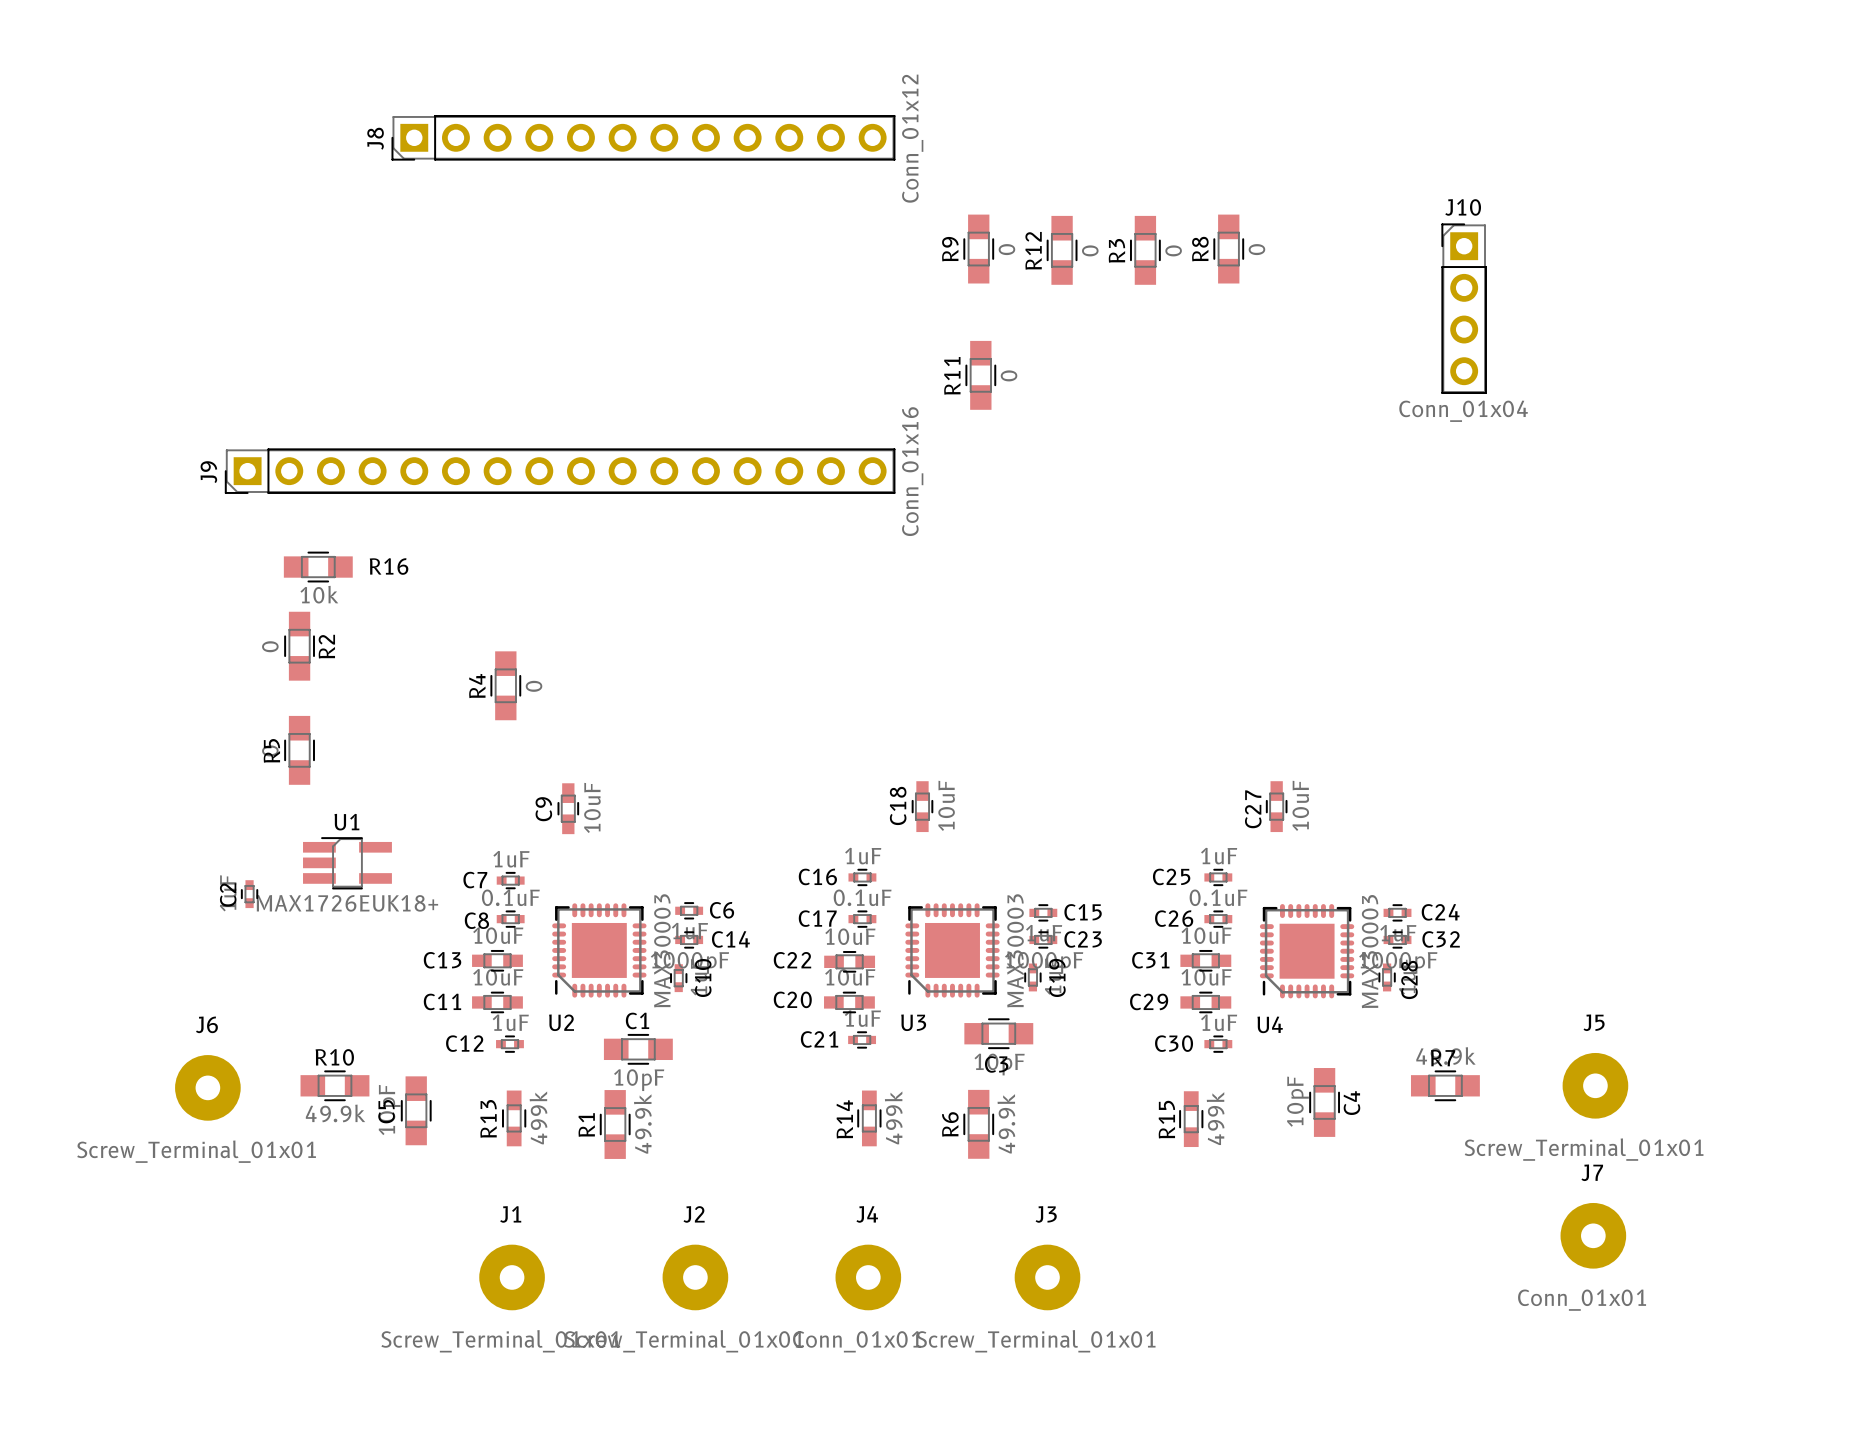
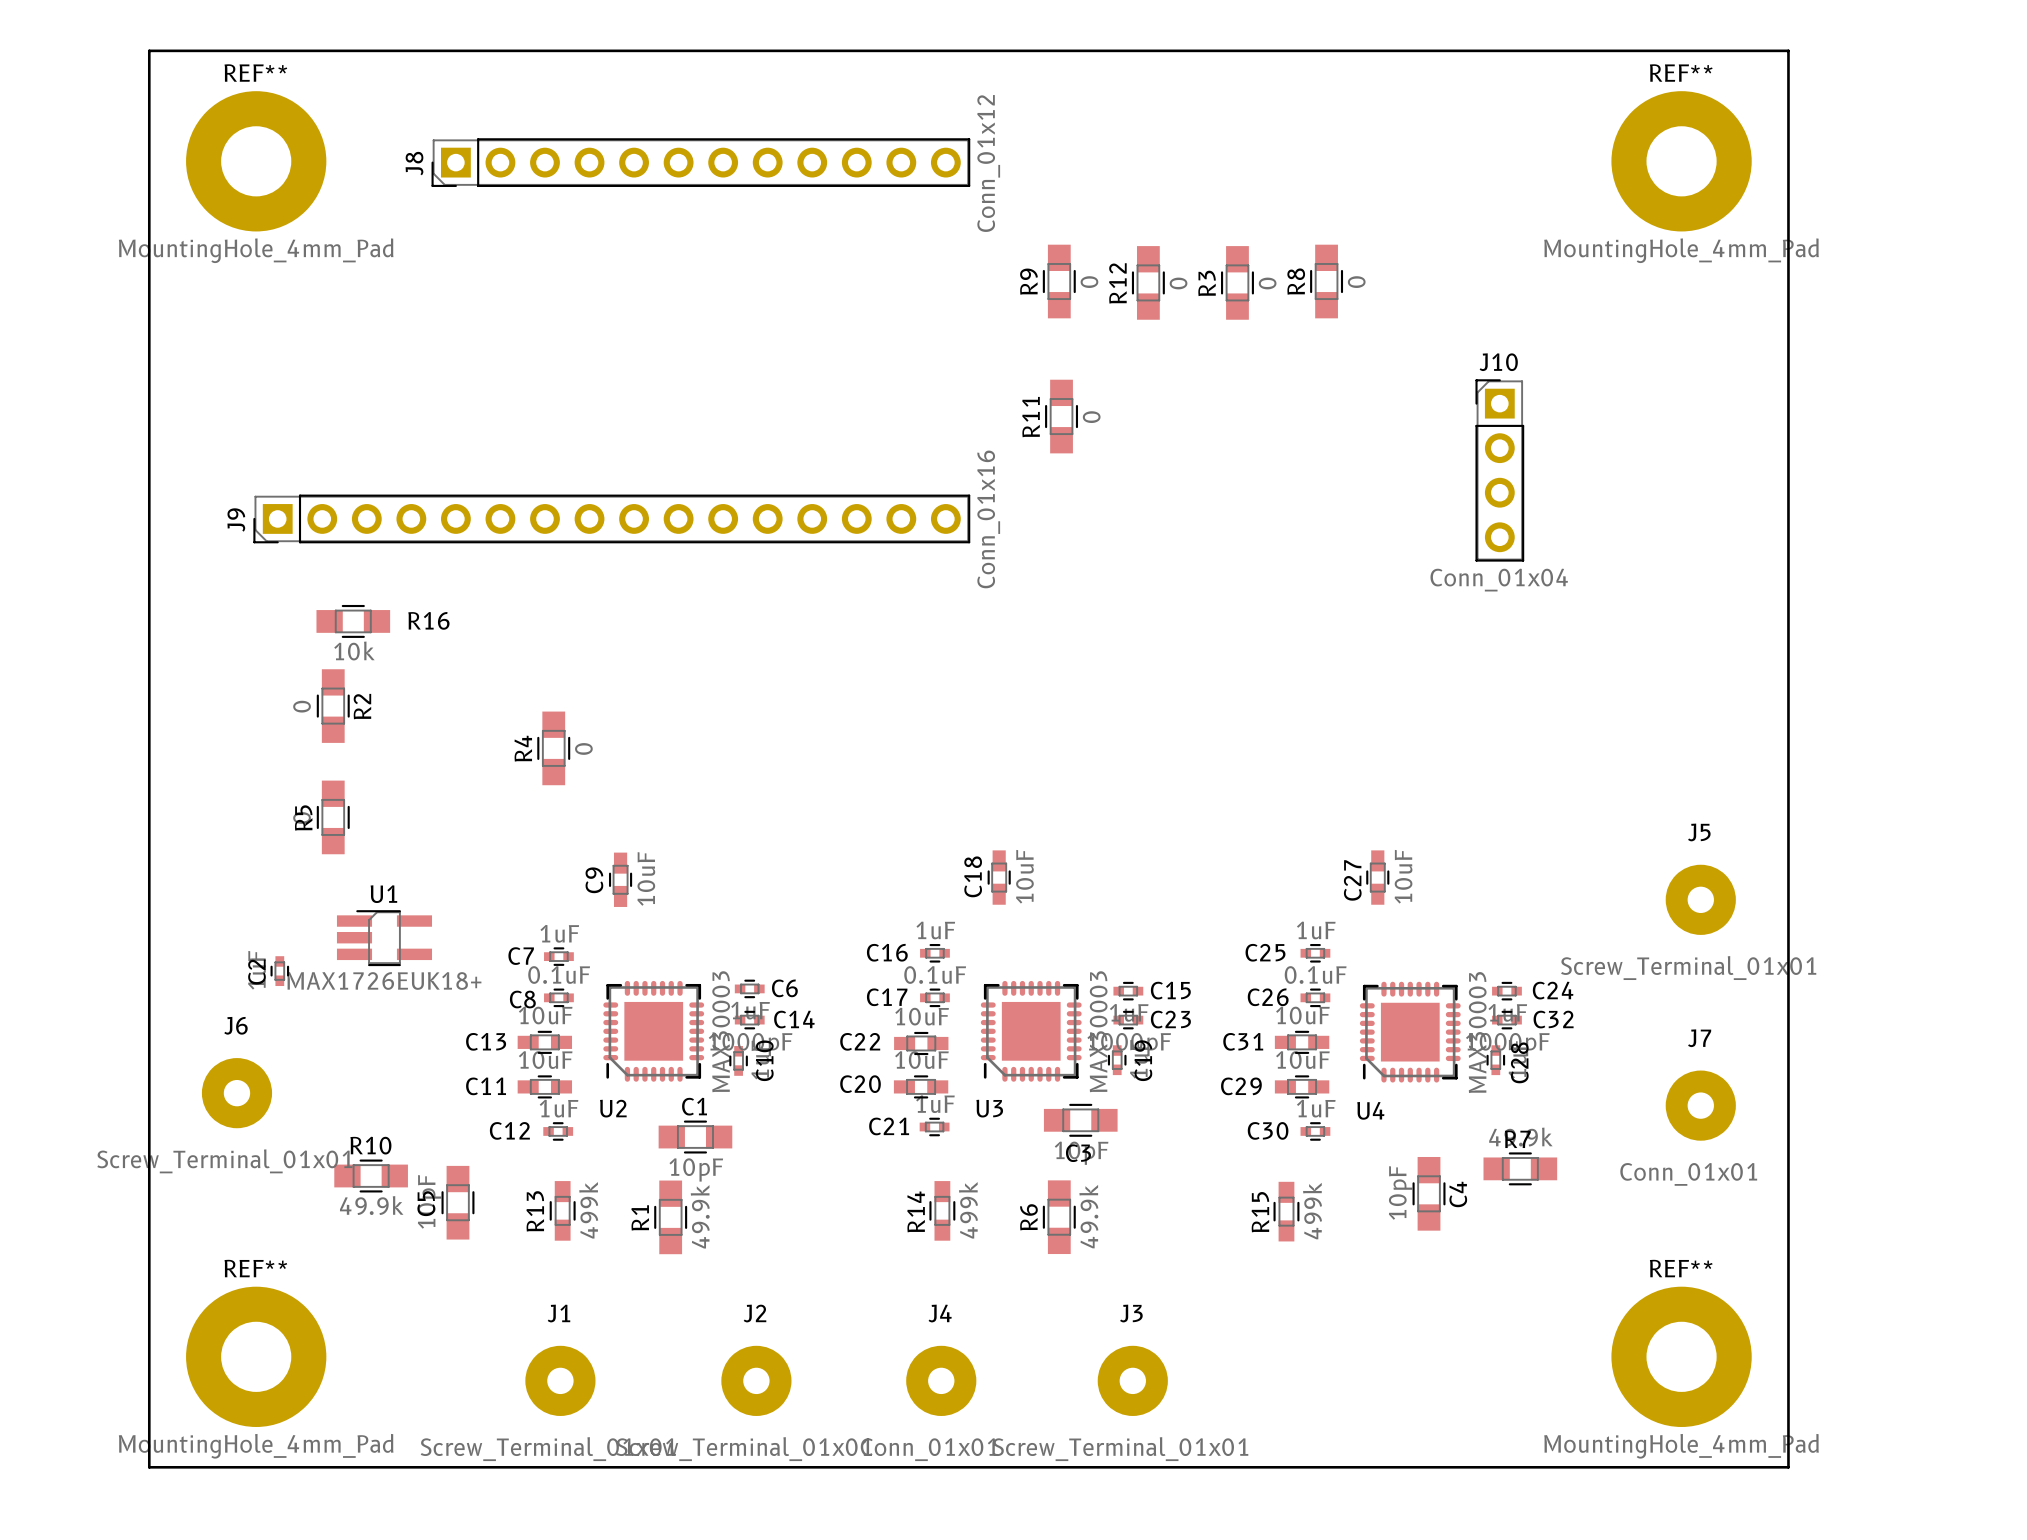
board edge: none -> (149, 50) (149, 1467) (1788, 1467) (1788, 50) (149, 50)
REF**: none -> MountingHole_4mm_Pad (256, 161)
REF**: none -> MountingHole_4mm_Pad (1681, 161)
J10 position: (1464, 308) -> (1499, 470)
R7 position: (1445, 1085) -> (1520, 1168)
J5 position: (1595, 1085) -> (1700, 899)
J6 position: (207, 1087) -> (236, 1093)
J7 position: (1593, 1235) -> (1700, 1105)
REF**: none -> MountingHole_4mm_Pad (256, 1356)
REF**: none -> MountingHole_4mm_Pad (1681, 1356)

